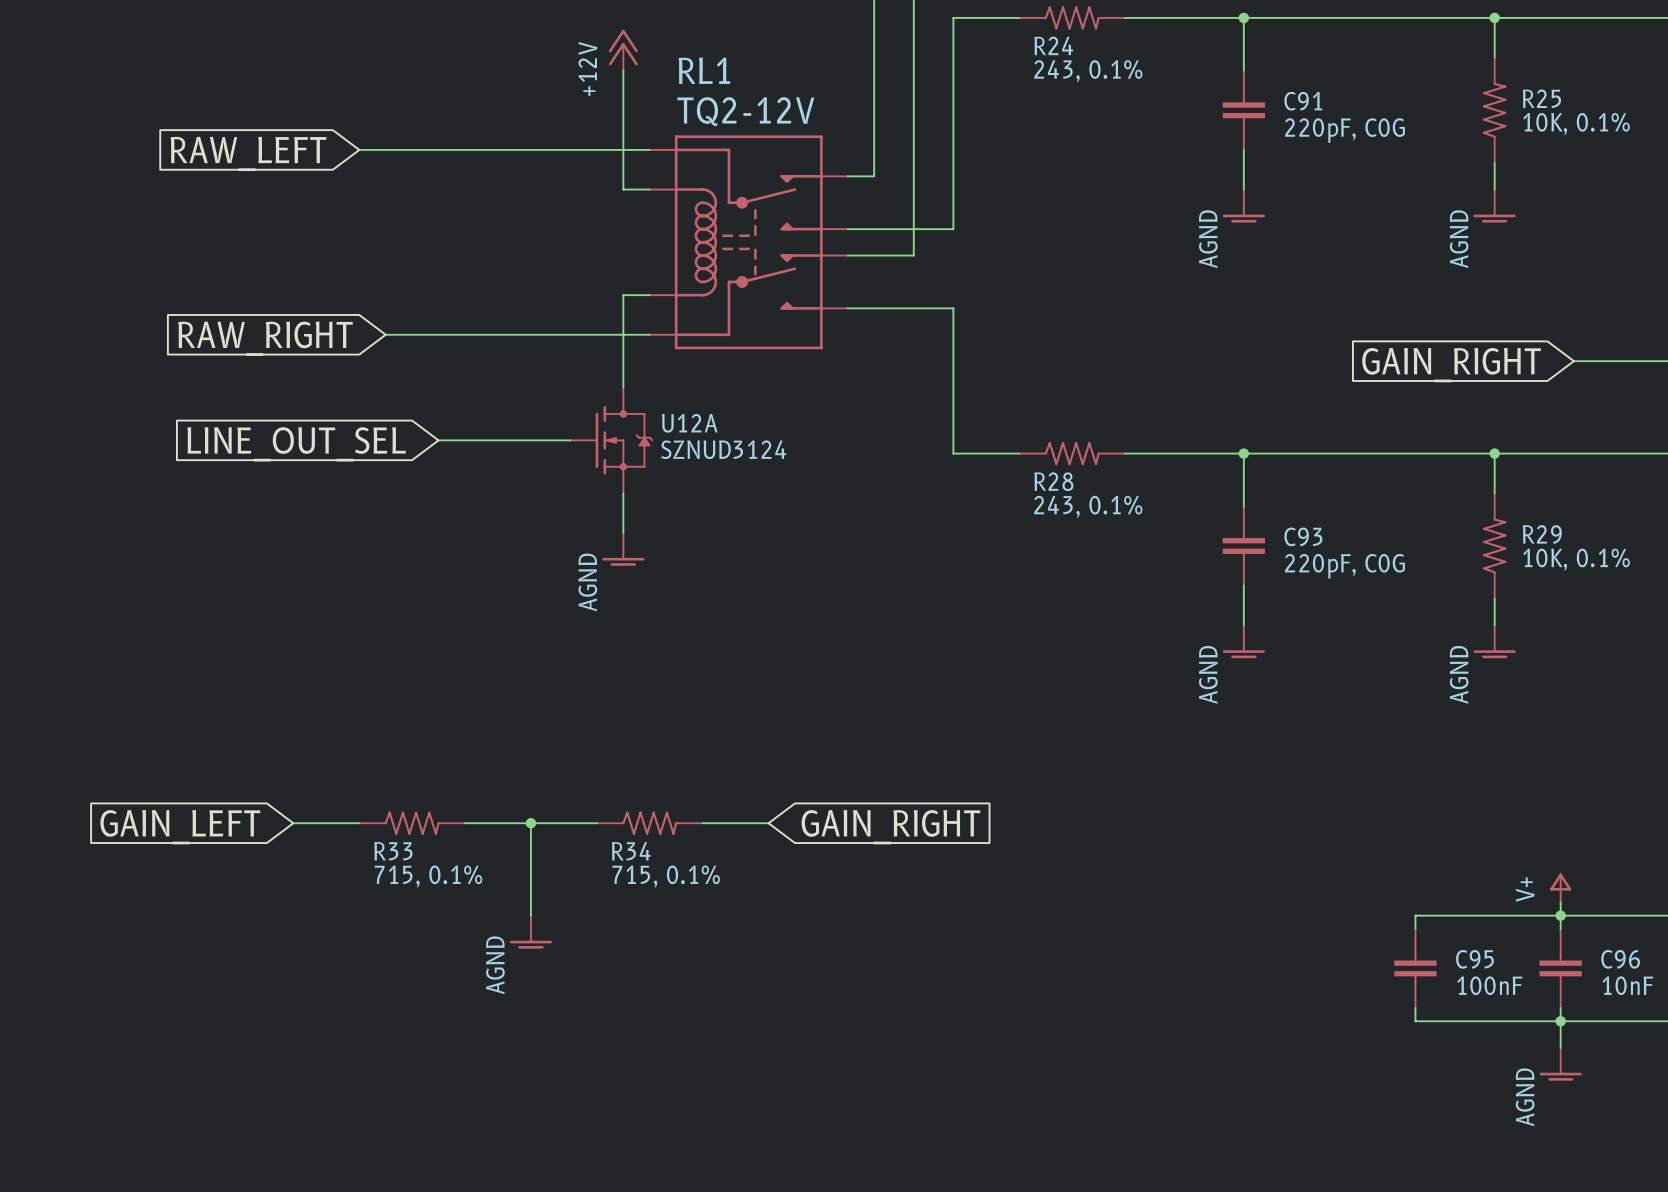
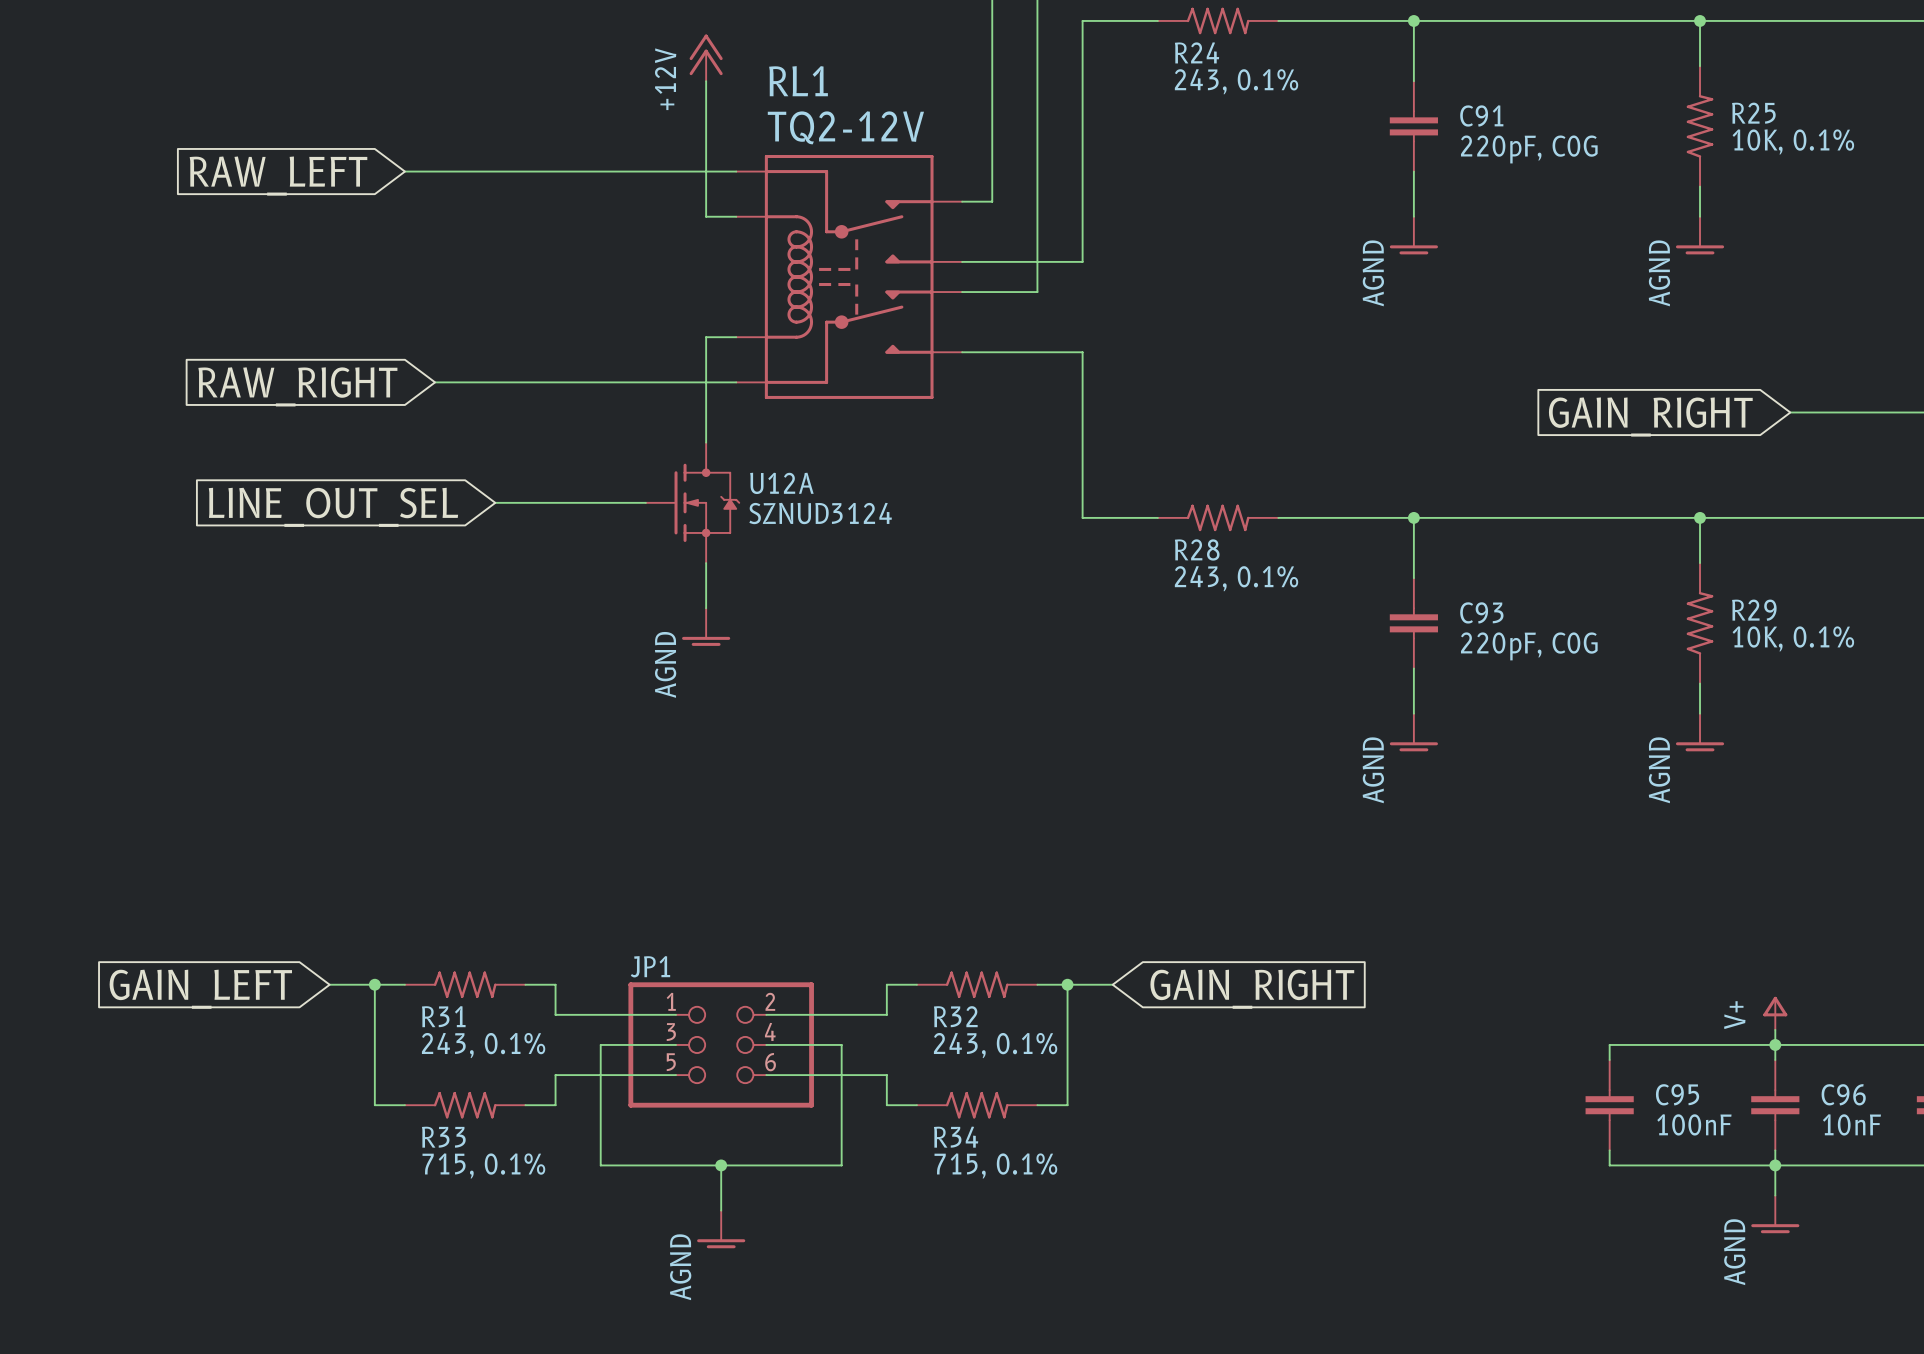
wire: (293, 823) (359, 823) -> (329, 984) (404, 984)
R33 position: (412, 823) -> (465, 1105)
wire: (464, 823) (596, 823) -> none
wire: (530, 823) (530, 915) -> none
junction: (530, 823) -> none
R34 position: (649, 823) -> (977, 1105)
wire: (702, 823) (768, 823) -> (1037, 984) (1112, 984)
global label position: GAIN_LEFT (180, 827) -> GAIN_LEFT (200, 989)
global label position: GAIN_RIGHT (890, 827) -> GAIN_RIGHT (1252, 989)
wire: none -> (374, 984) (374, 1105) (404, 1105)
junction: none -> (374, 984)
R31: none -> 243, 0.1% (465, 984)
wire: none -> (525, 984) (555, 984) (555, 1014) (676, 1014)
wire: none -> (916, 984) (886, 984) (886, 1014) (766, 1014)
R32: none -> 243, 0.1% (977, 984)
wire: none -> (1067, 984) (1067, 1105) (1037, 1105)
junction: none -> (1067, 984)
wire: none -> (676, 1044) (600, 1044) (600, 1165) (841, 1165) (841, 1044) (766, 1044)
JP1: none -> (721, 1044)
power symbol position: AGND (530, 932) -> AGND (721, 1229)
wire: none -> (676, 1075) (555, 1075) (555, 1105) (525, 1105)
wire: none -> (766, 1075) (886, 1075) (886, 1105) (916, 1105)
wire: none -> (721, 1165) (721, 1210)
junction: none -> (721, 1165)

